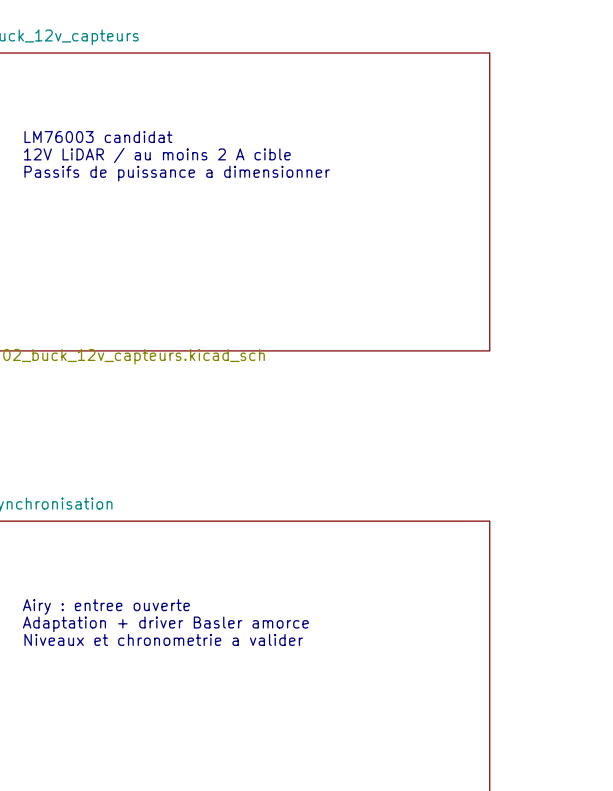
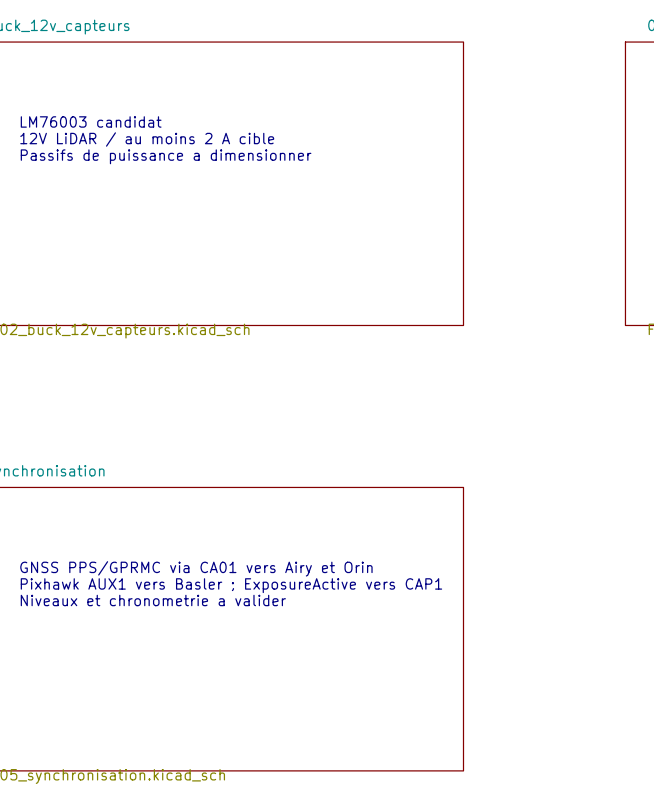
text: Airy : entree ouverte (106, 606) -> GNSS PPS/GPRMC via CA01 vers Airy et Orin (196, 568)
text: Adaptation + driver Basler amorce (165, 624) -> Pixhawk AUX1 vers Basler ; ExposureActive vers CAP1 (231, 585)

